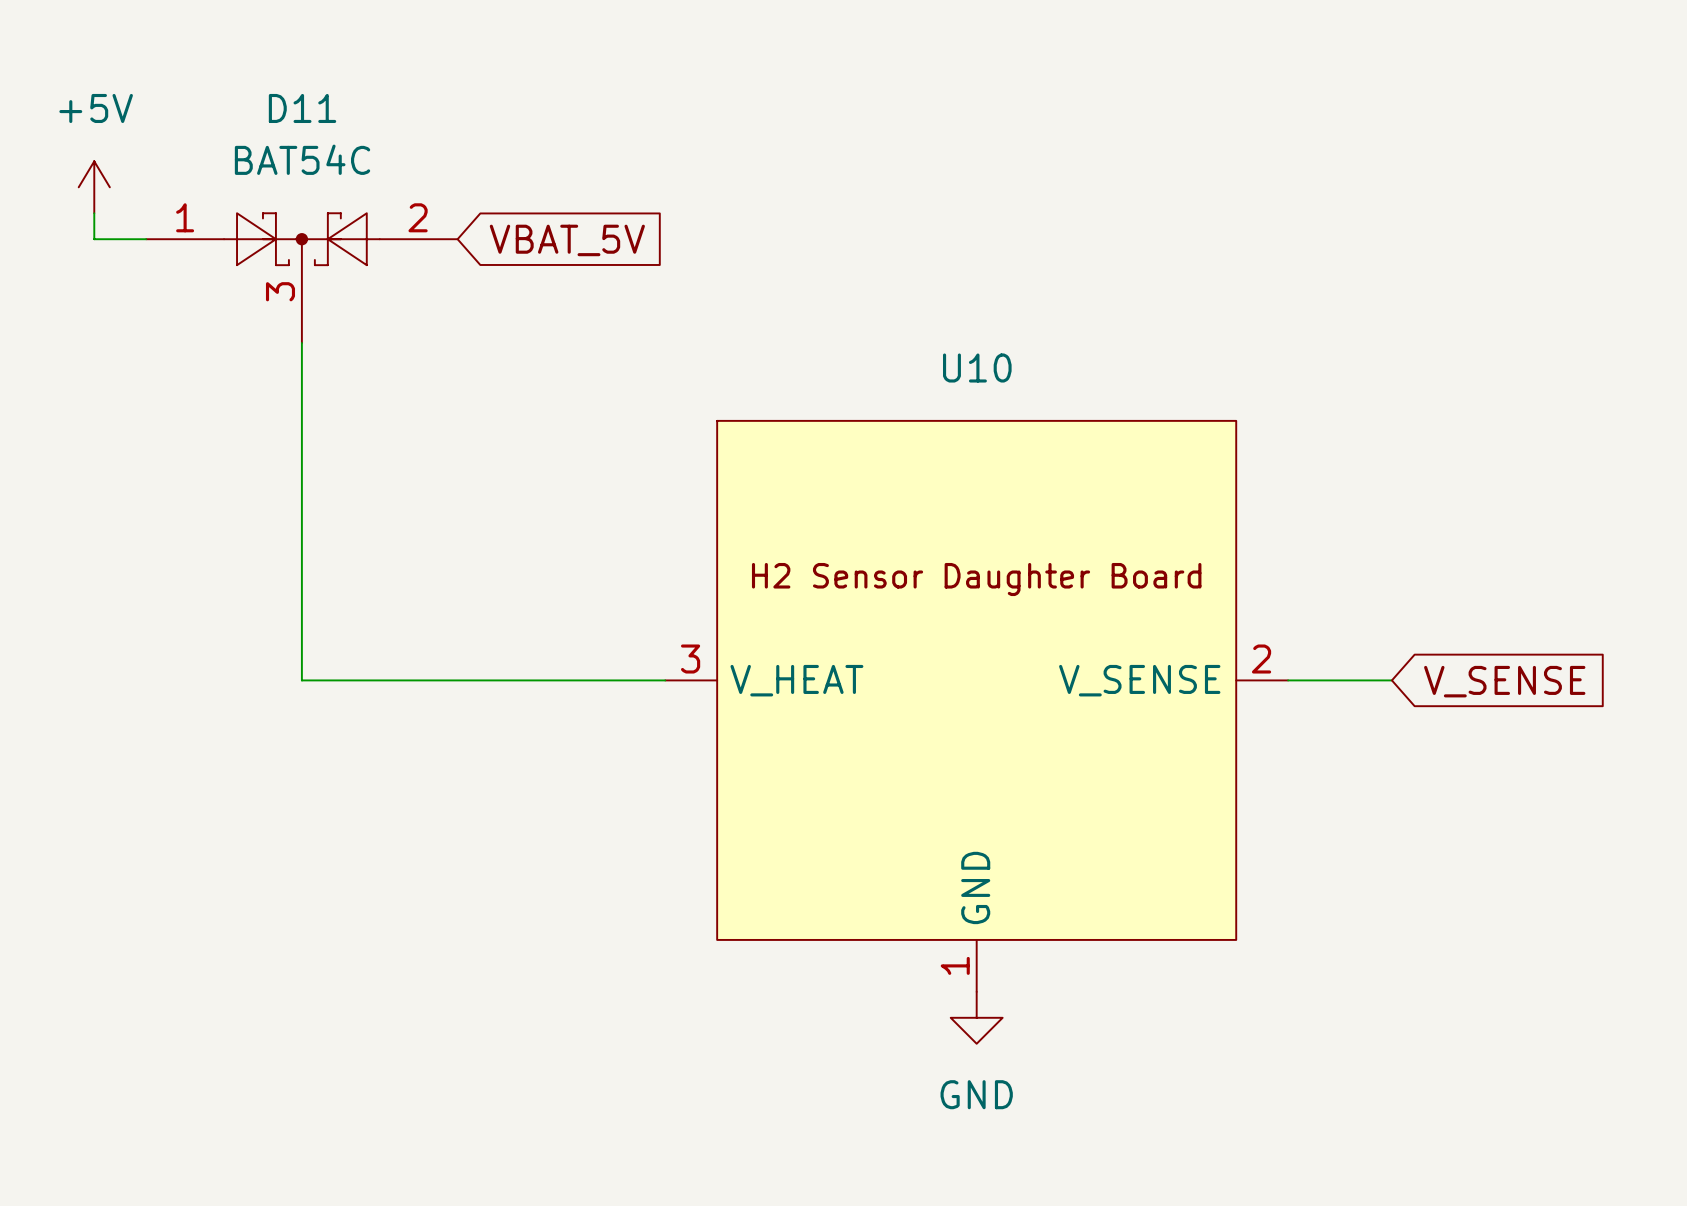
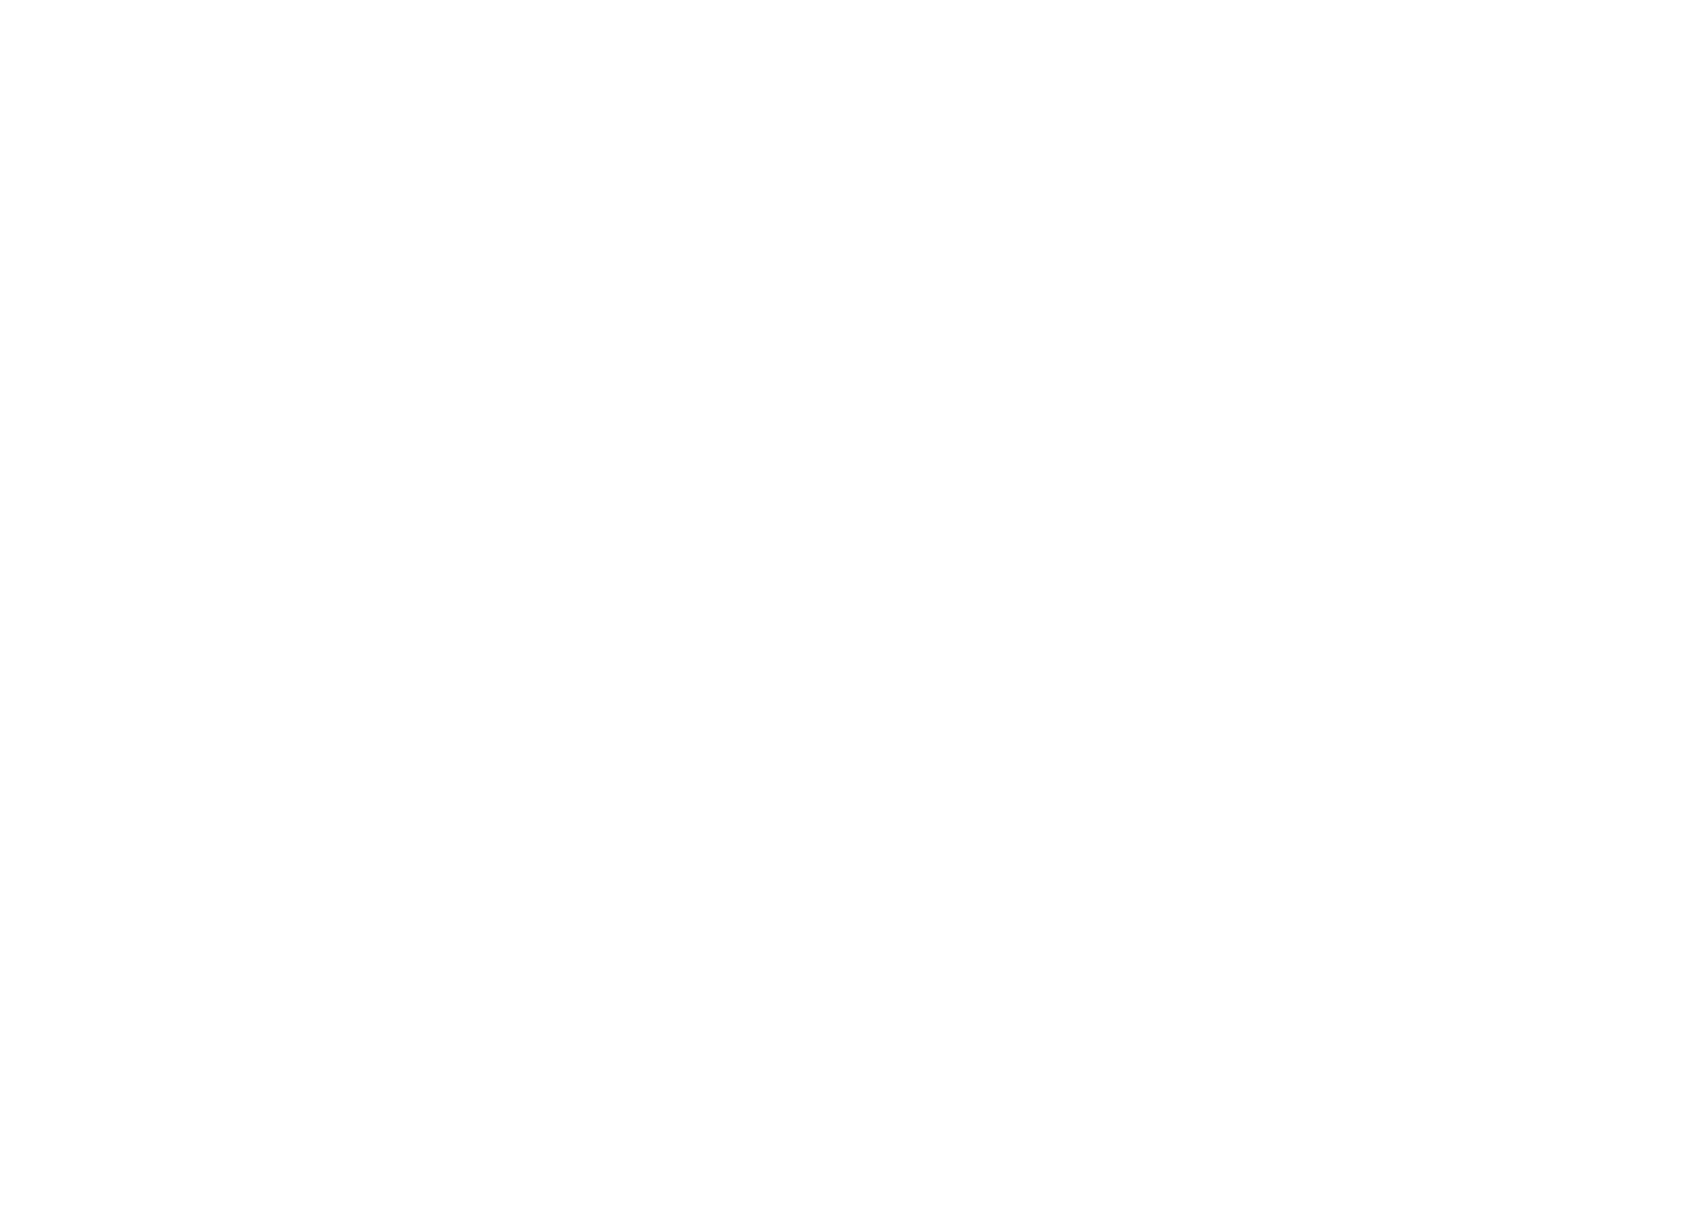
power symbol: +5V (94, 187) -> none
wire: (94, 213) (94, 239) (146, 239) -> none
global label: VBAT_5V (567, 240) -> none
D11: BAT54C (301, 278) -> none
wire: (301, 343) (301, 680) (665, 680) -> none
wire: (1288, 680) (1391, 680) -> none
global label: V_SENSE (1504, 681) -> none
U10: (976, 706) -> none
power symbol: GND (976, 1017) -> none

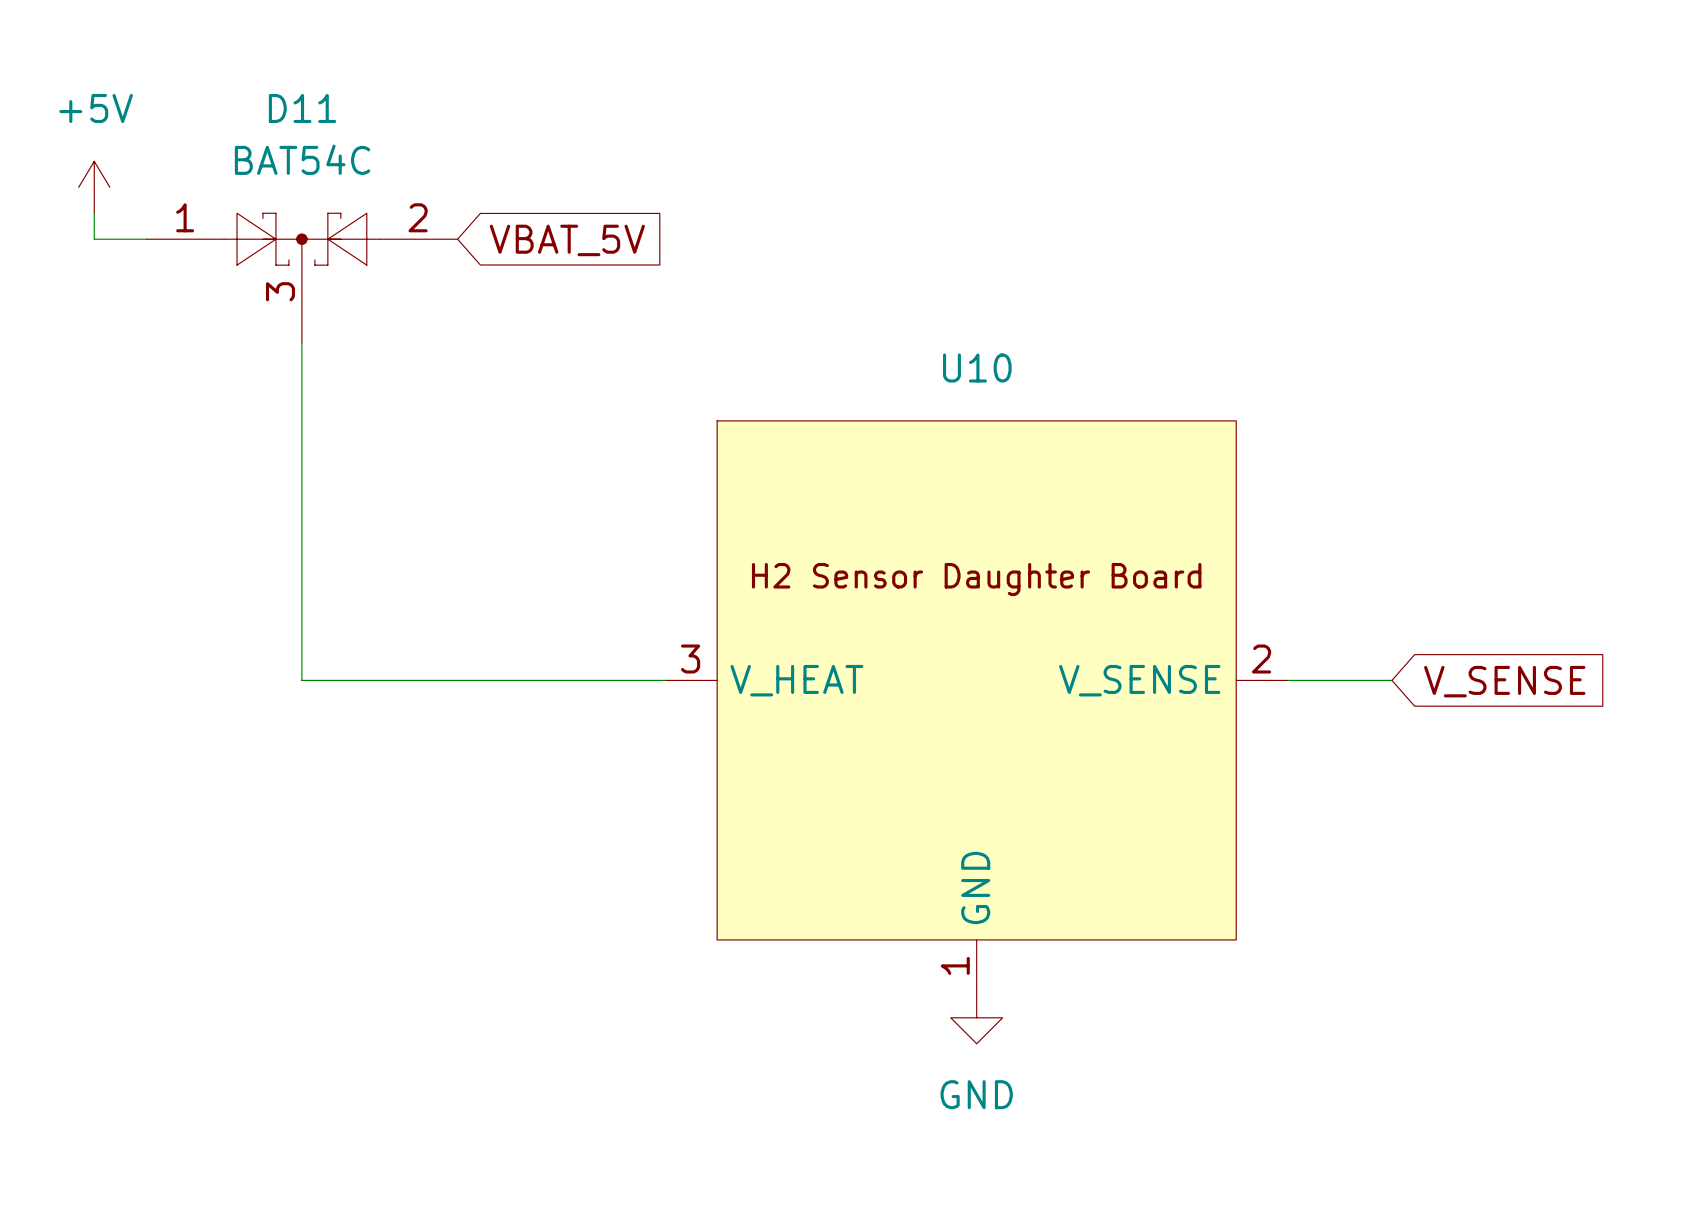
power symbol: none -> +5V (94, 187)
wire: none -> (94, 213) (94, 239) (146, 239)
global label: none -> VBAT_5V (567, 240)
D11: none -> BAT54C (301, 278)
wire: none -> (301, 343) (301, 680) (665, 680)
wire: none -> (1288, 680) (1391, 680)
global label: none -> V_SENSE (1504, 681)
U10: none -> (976, 706)
power symbol: none -> GND (976, 1017)

